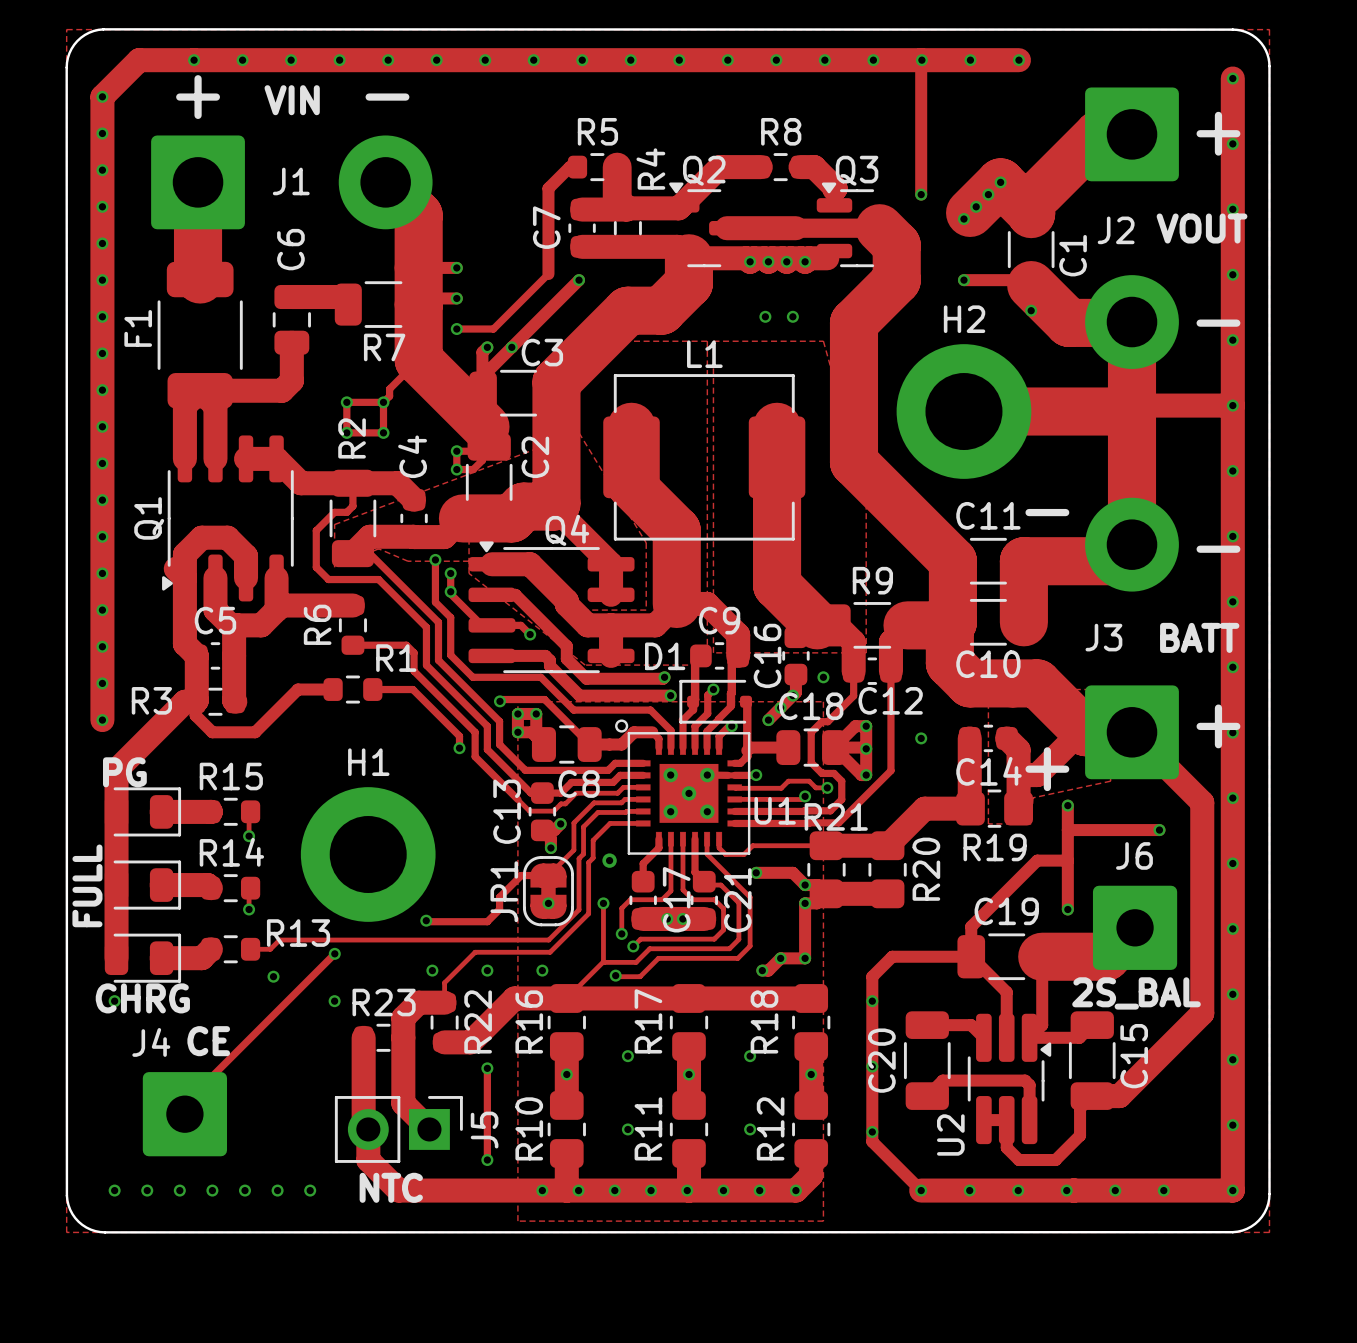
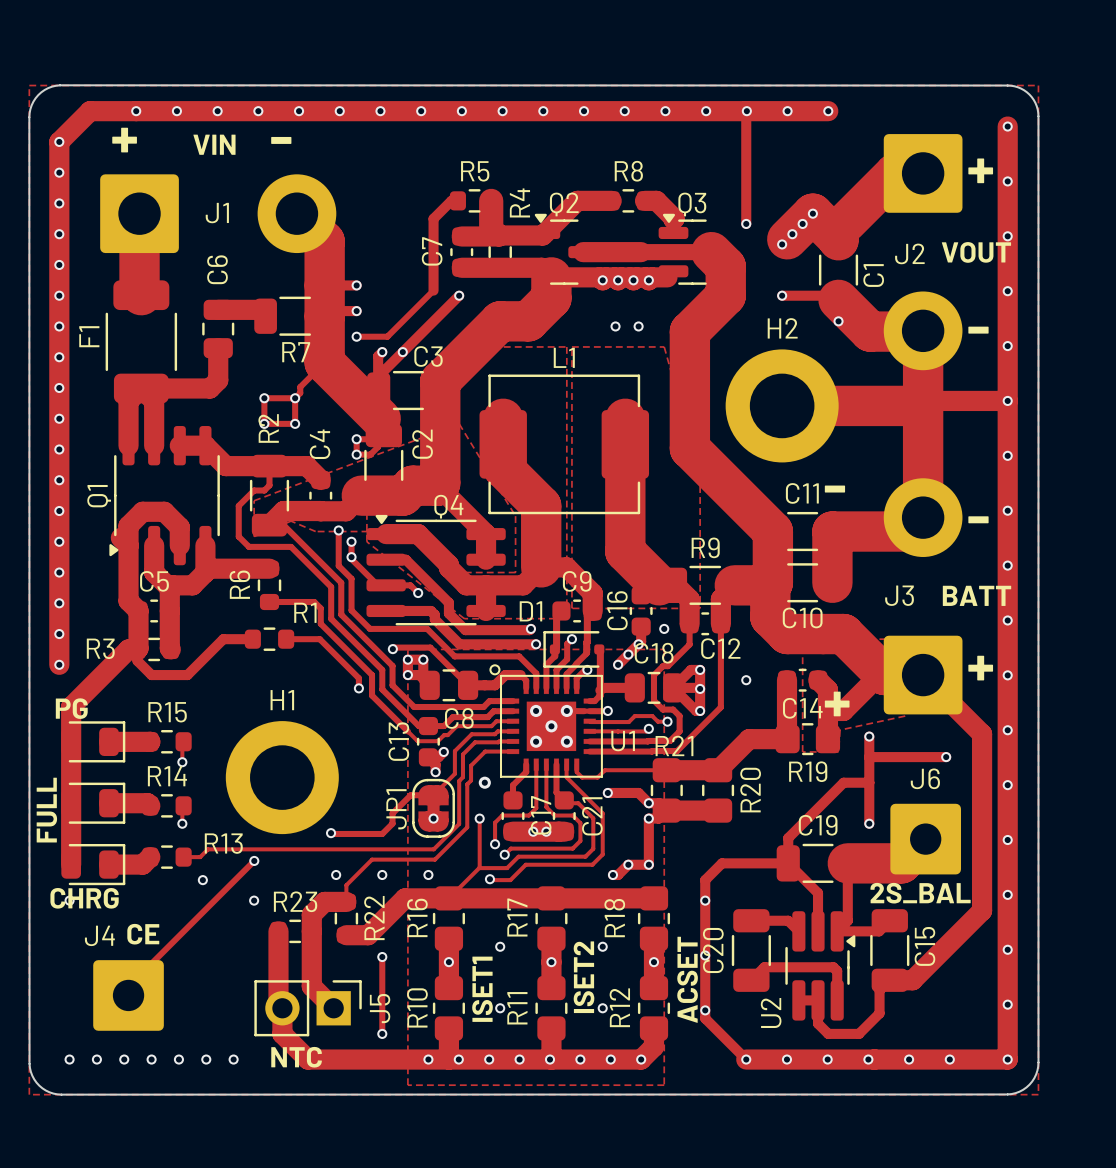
text: none -> ACSET (687, 979)
R11 value: none -> ISET2 (584, 977)
text: none -> ISET1 (482, 989)

